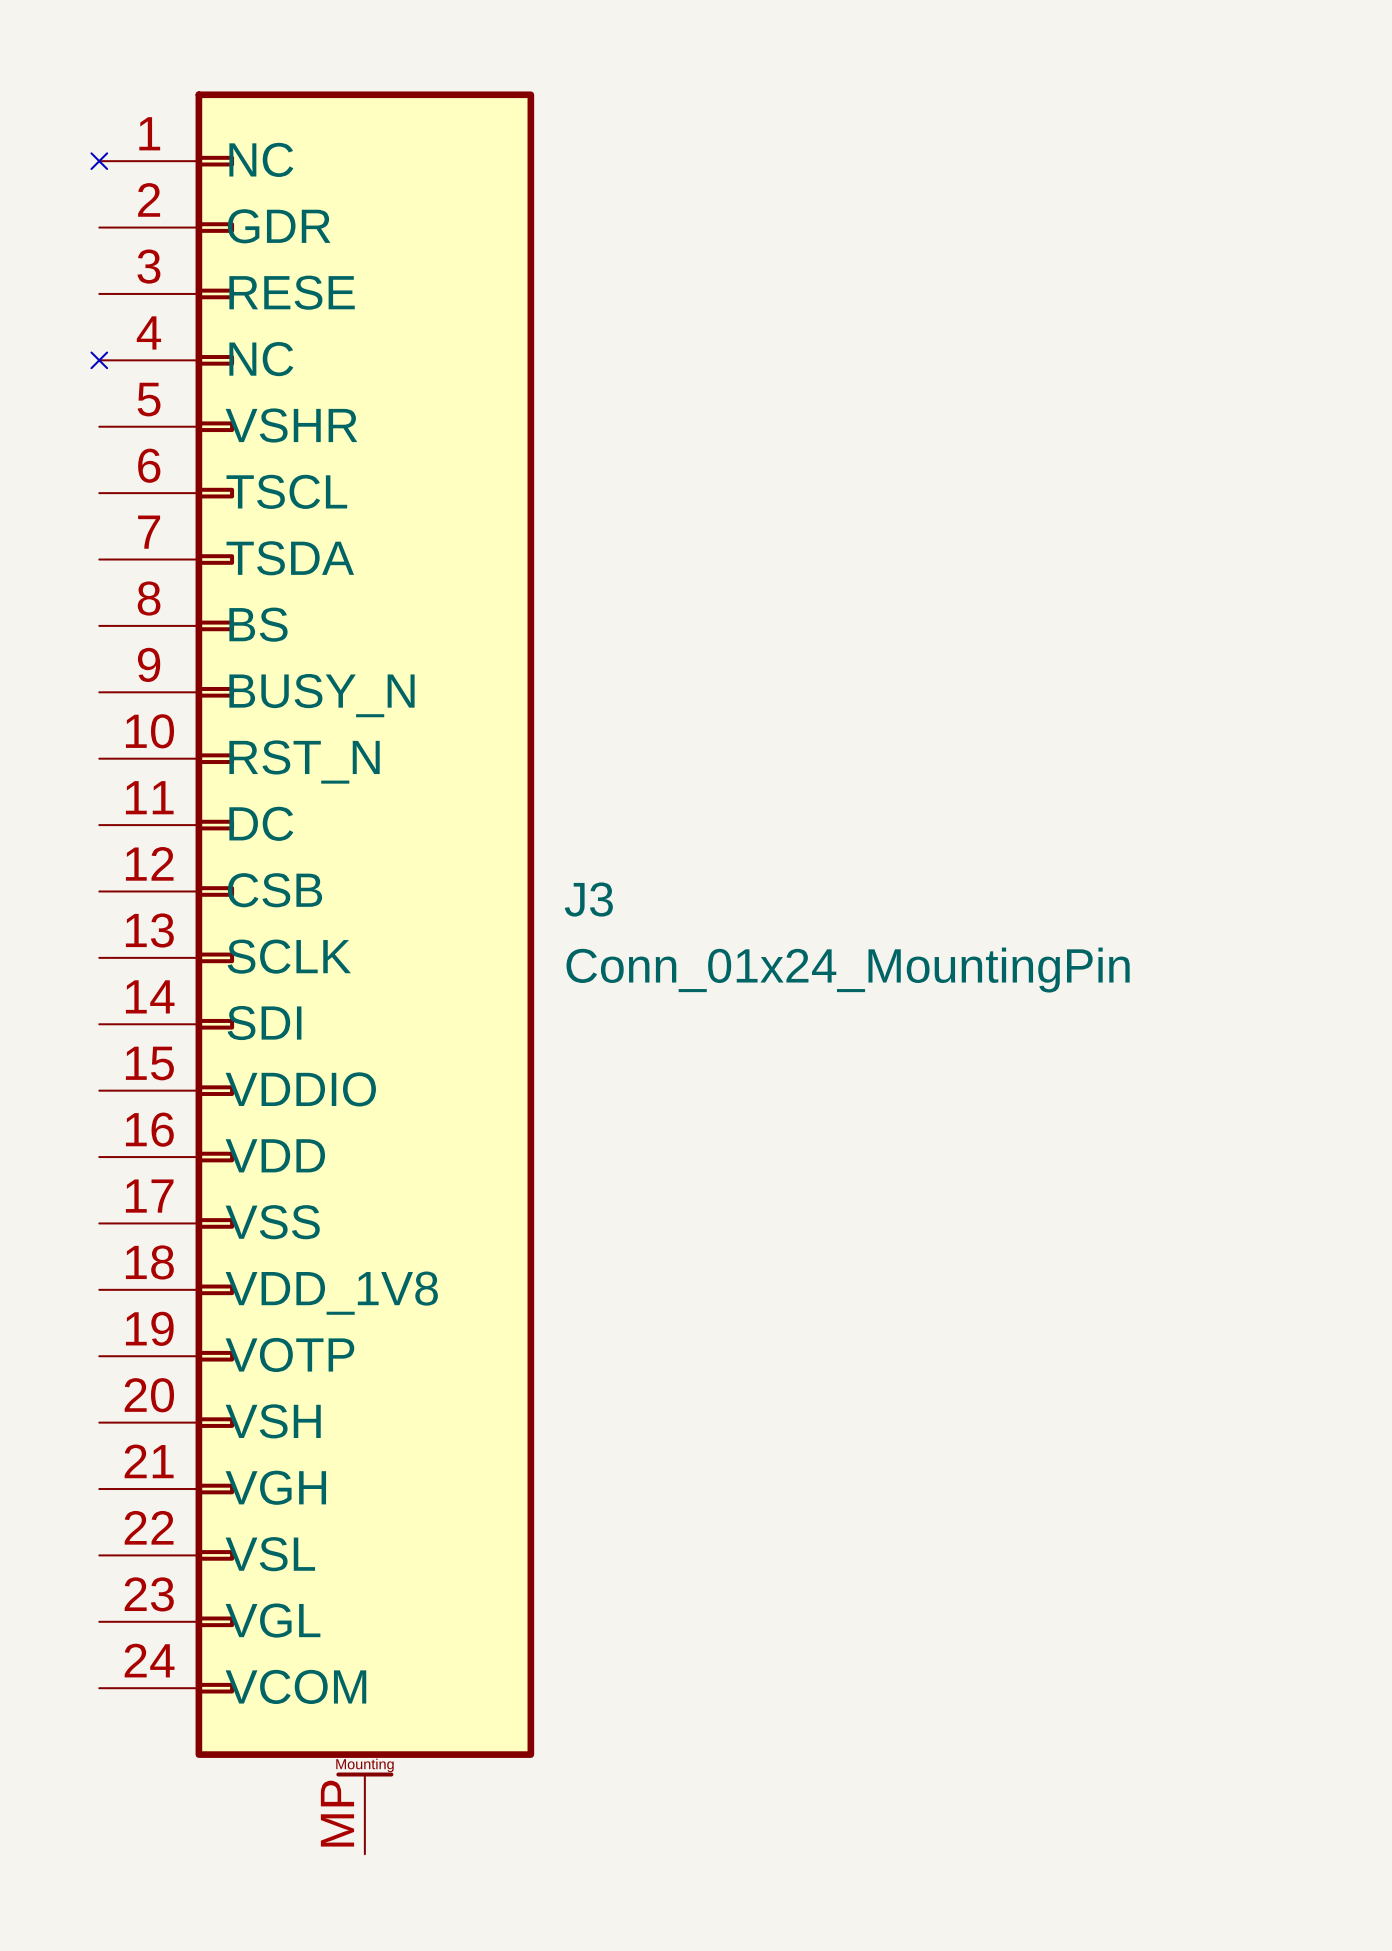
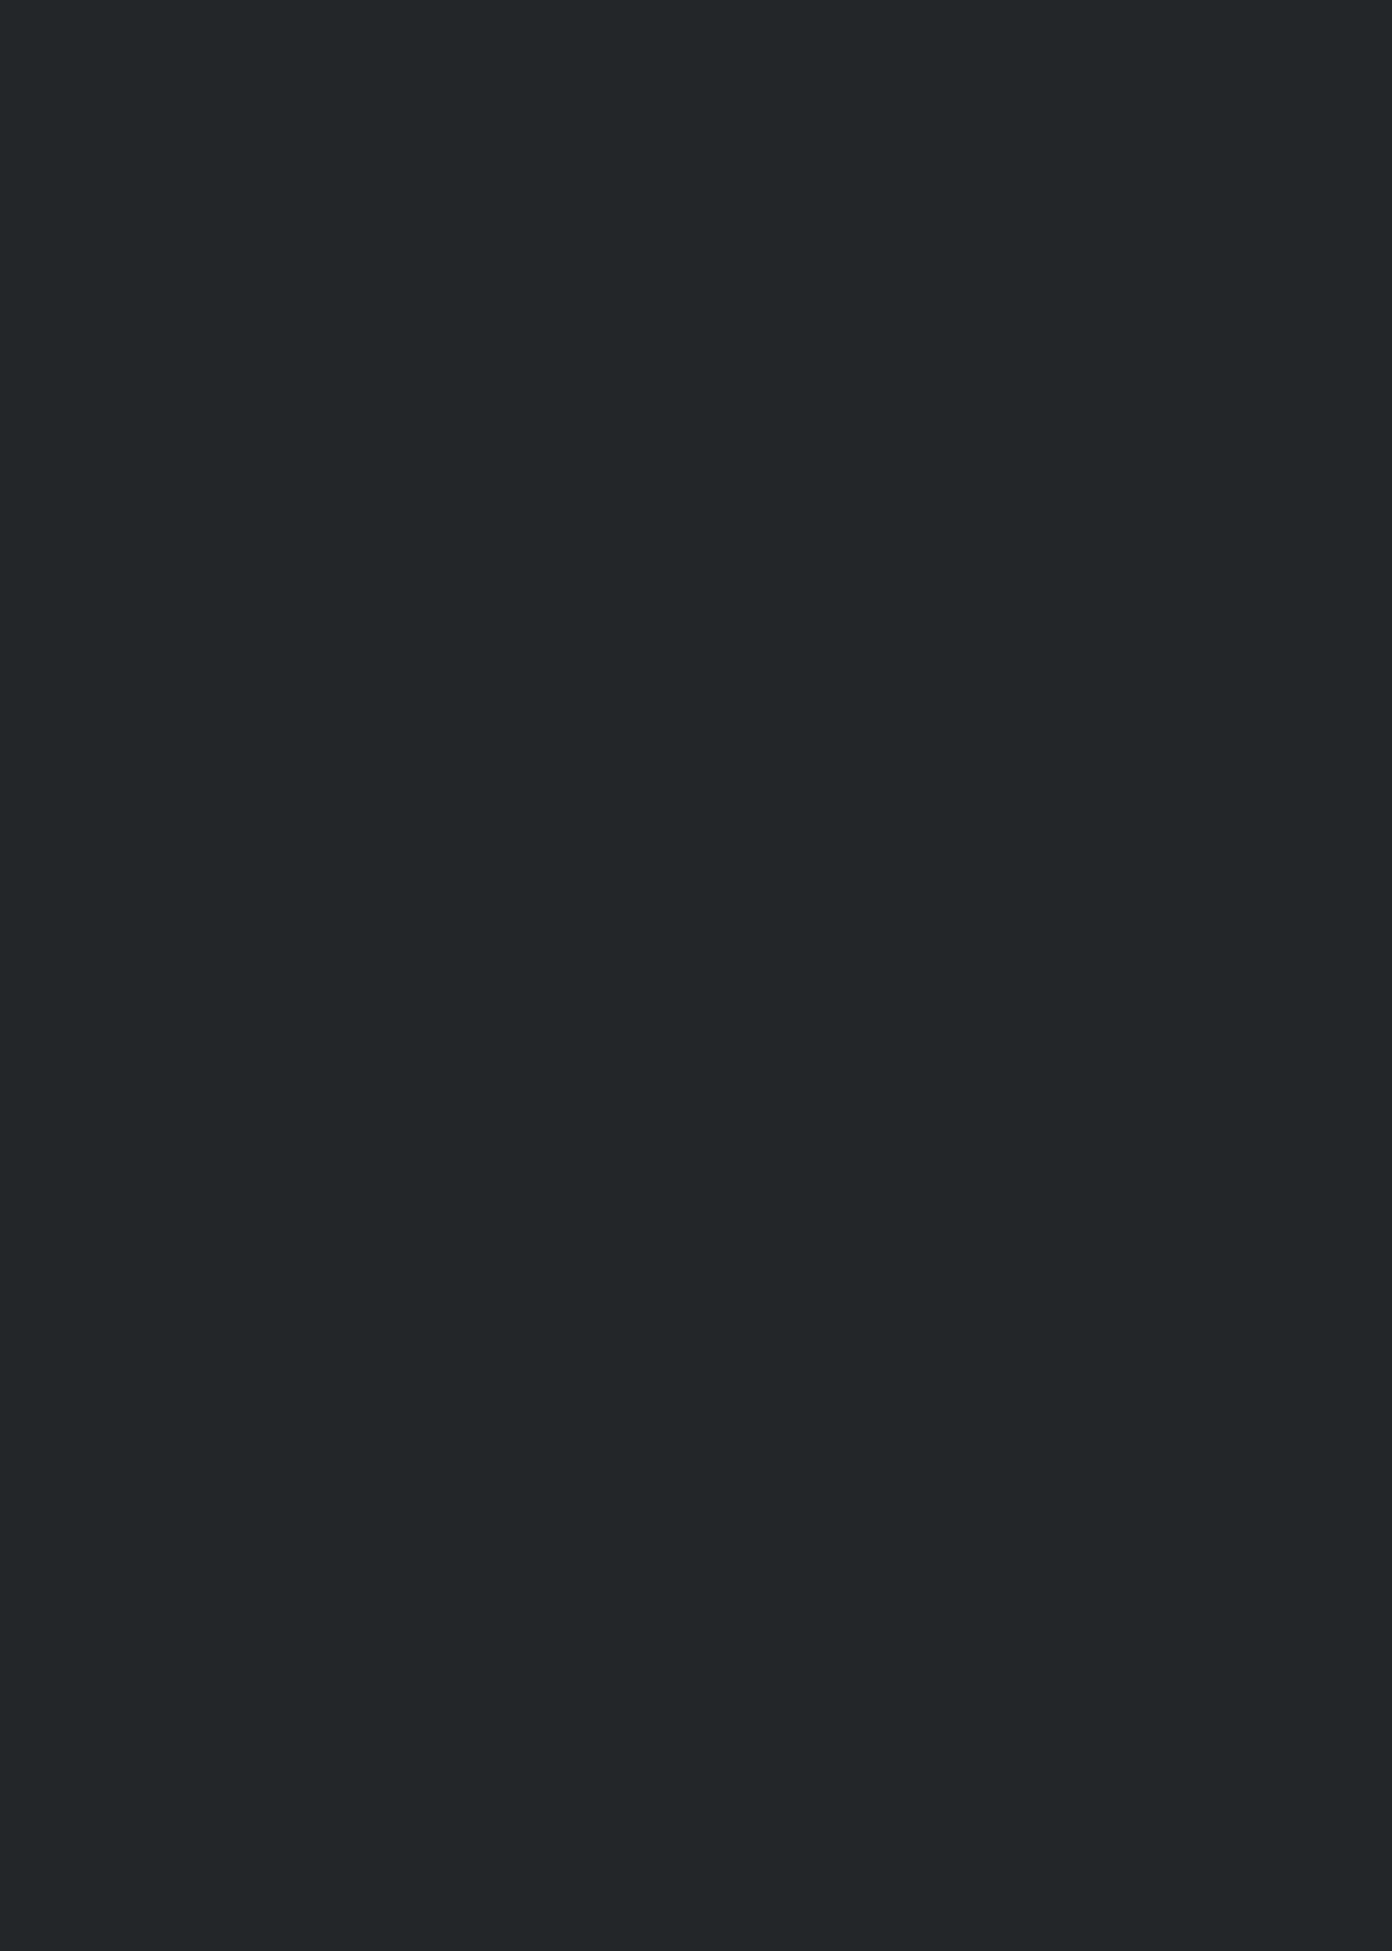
J3: Conn_01x24_MountingPin (312, 972) -> none

